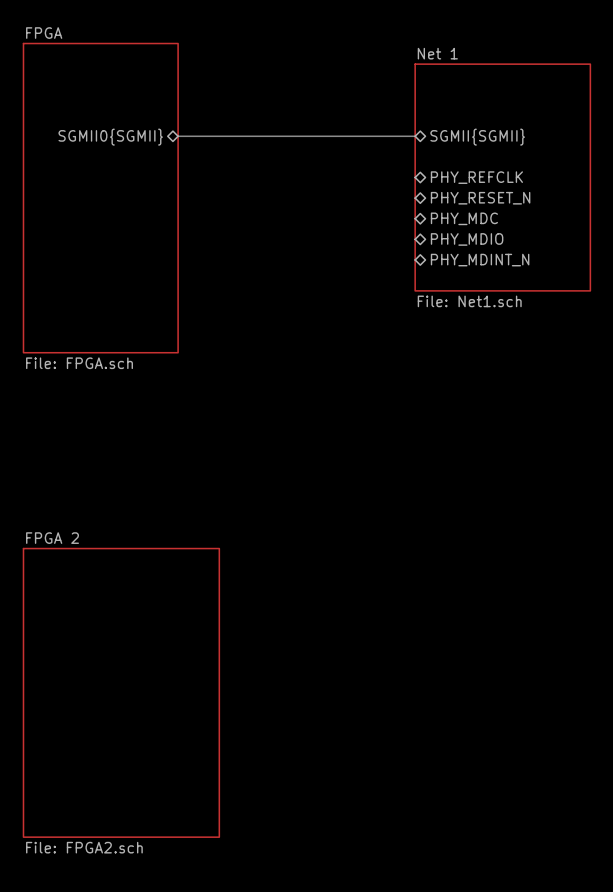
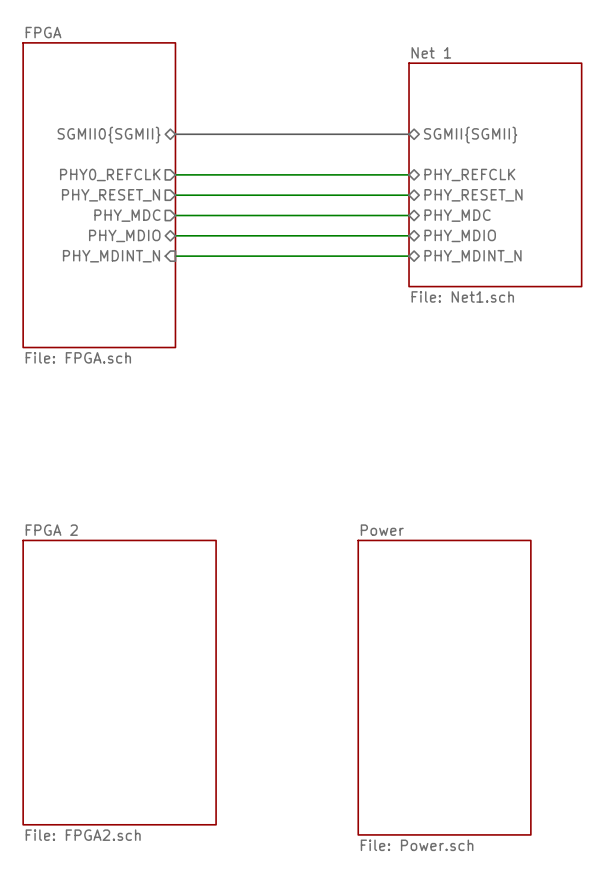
sheet pin: none -> PHY0_REFCLK (110, 174)
wire: none -> (175, 174) (409, 174)
sheet pin: none -> PHY_RESET_N (110, 195)
wire: none -> (175, 195) (409, 195)
sheet pin: none -> PHY_MDC (127, 215)
wire: none -> (175, 215) (409, 215)
sheet pin: none -> PHY_MDIO (124, 235)
wire: none -> (175, 235) (409, 235)
wire: none -> (175, 256) (409, 256)
sheet pin: none -> PHY_MDINT_N (111, 256)
sheet Power: none -> File: Power.sch (444, 687)

